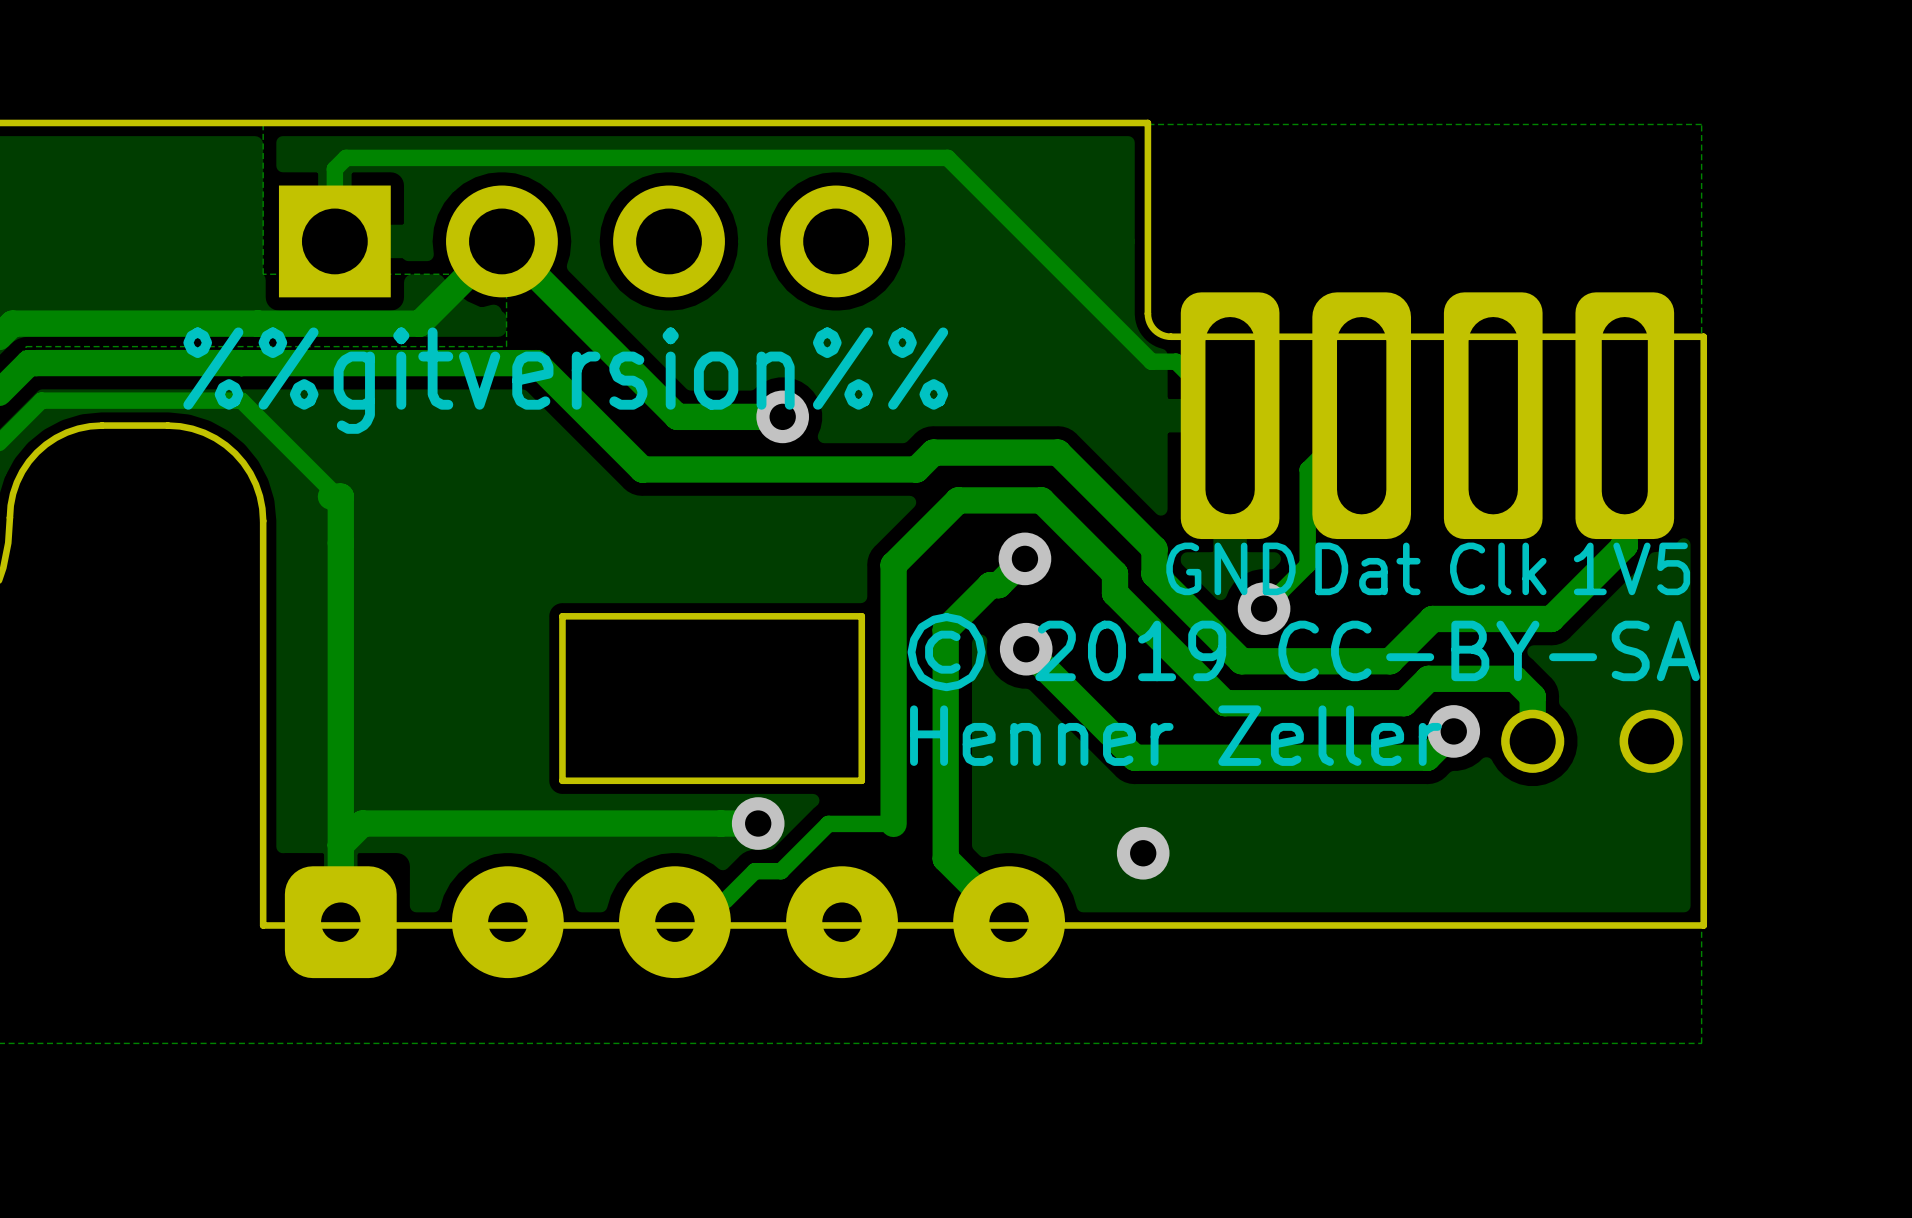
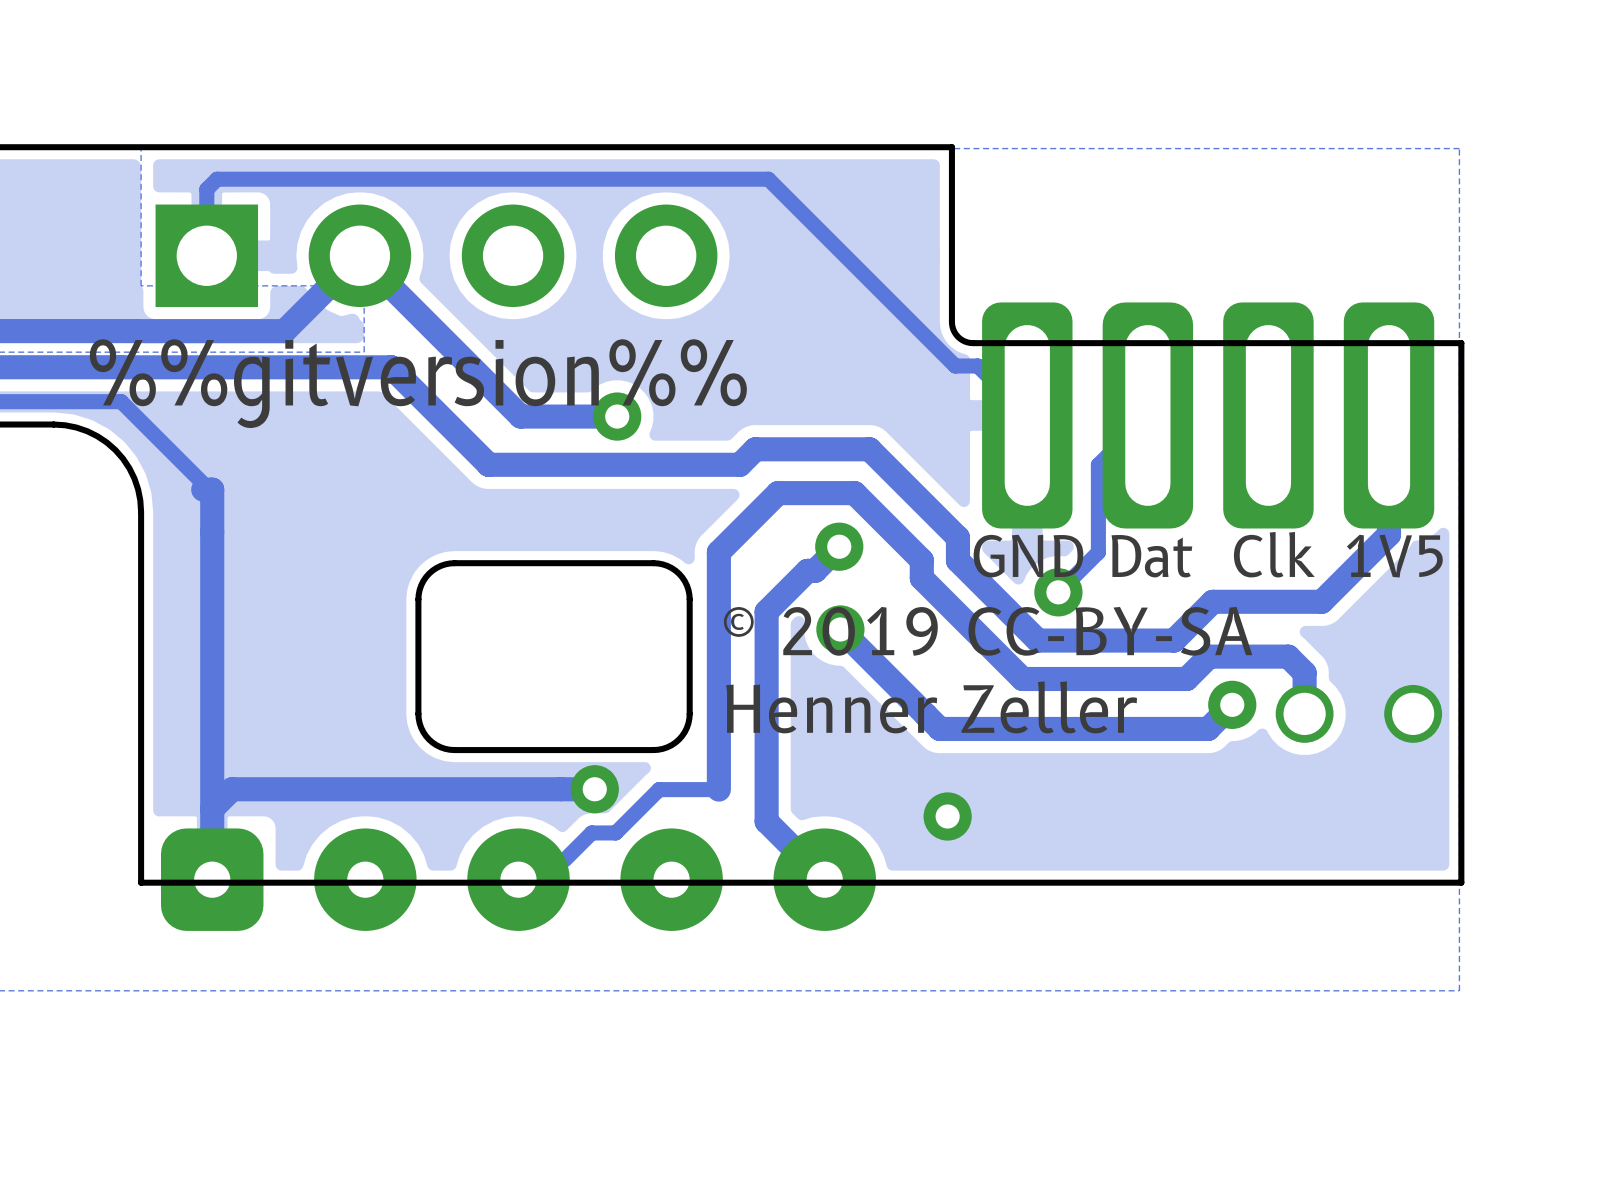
board edge: (861, 616) (562, 616) (562, 780) (605, 780) -> (689, 599) (686, 585) (679, 573) (667, 565) (658, 563) (454, 563) (436, 568) (423, 581) (418, 594) (418, 718) (423, 731) (432, 742) (440, 747) (454, 750)
board edge: (861, 741) (861, 780) (822, 780) -> (689, 713) (686, 727) (679, 739) (667, 747) (653, 750)

